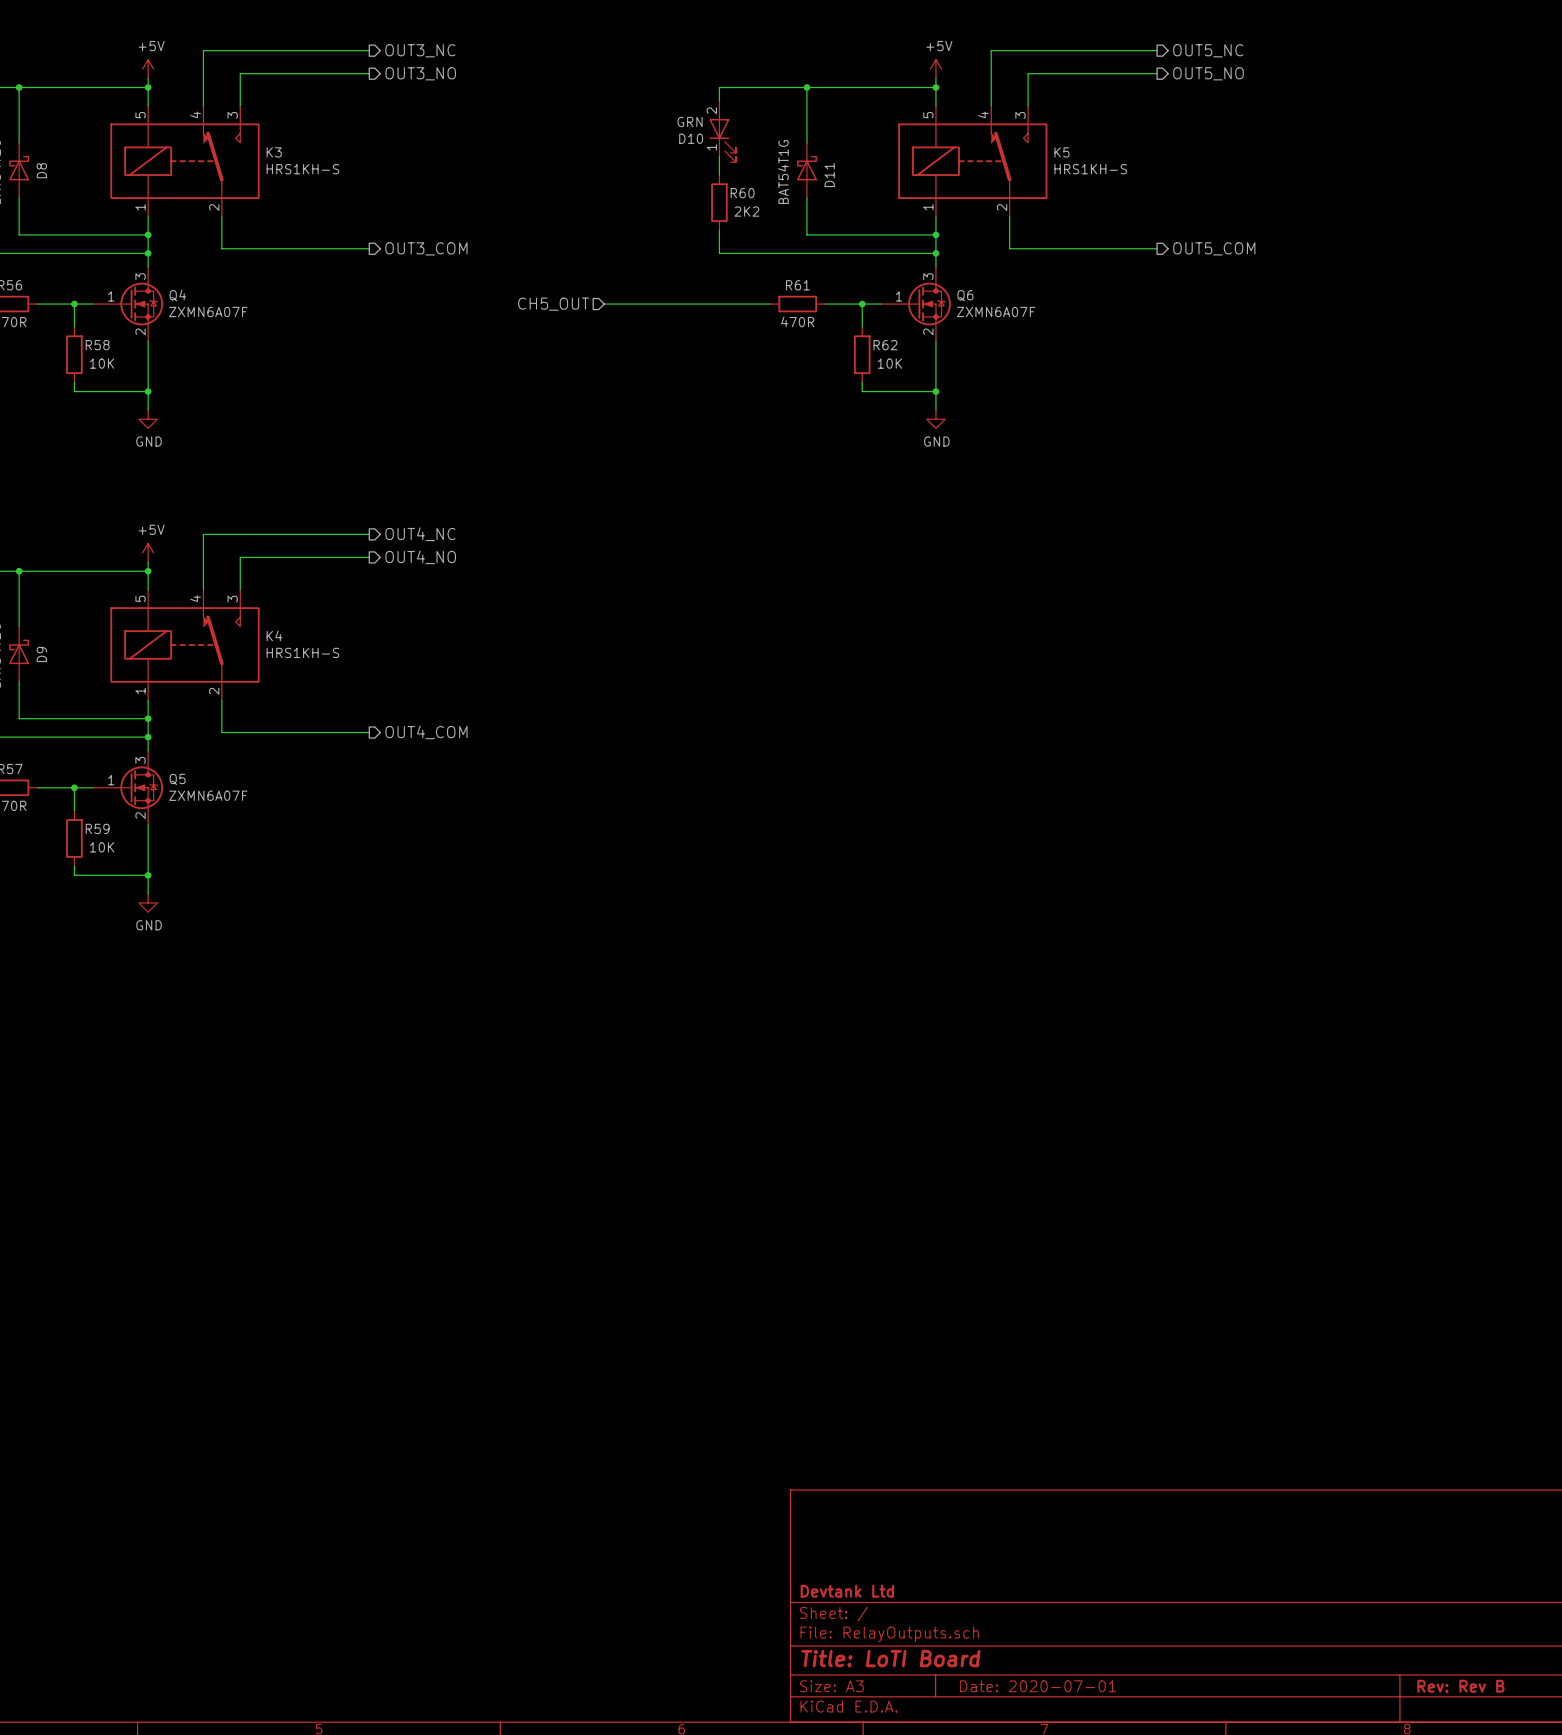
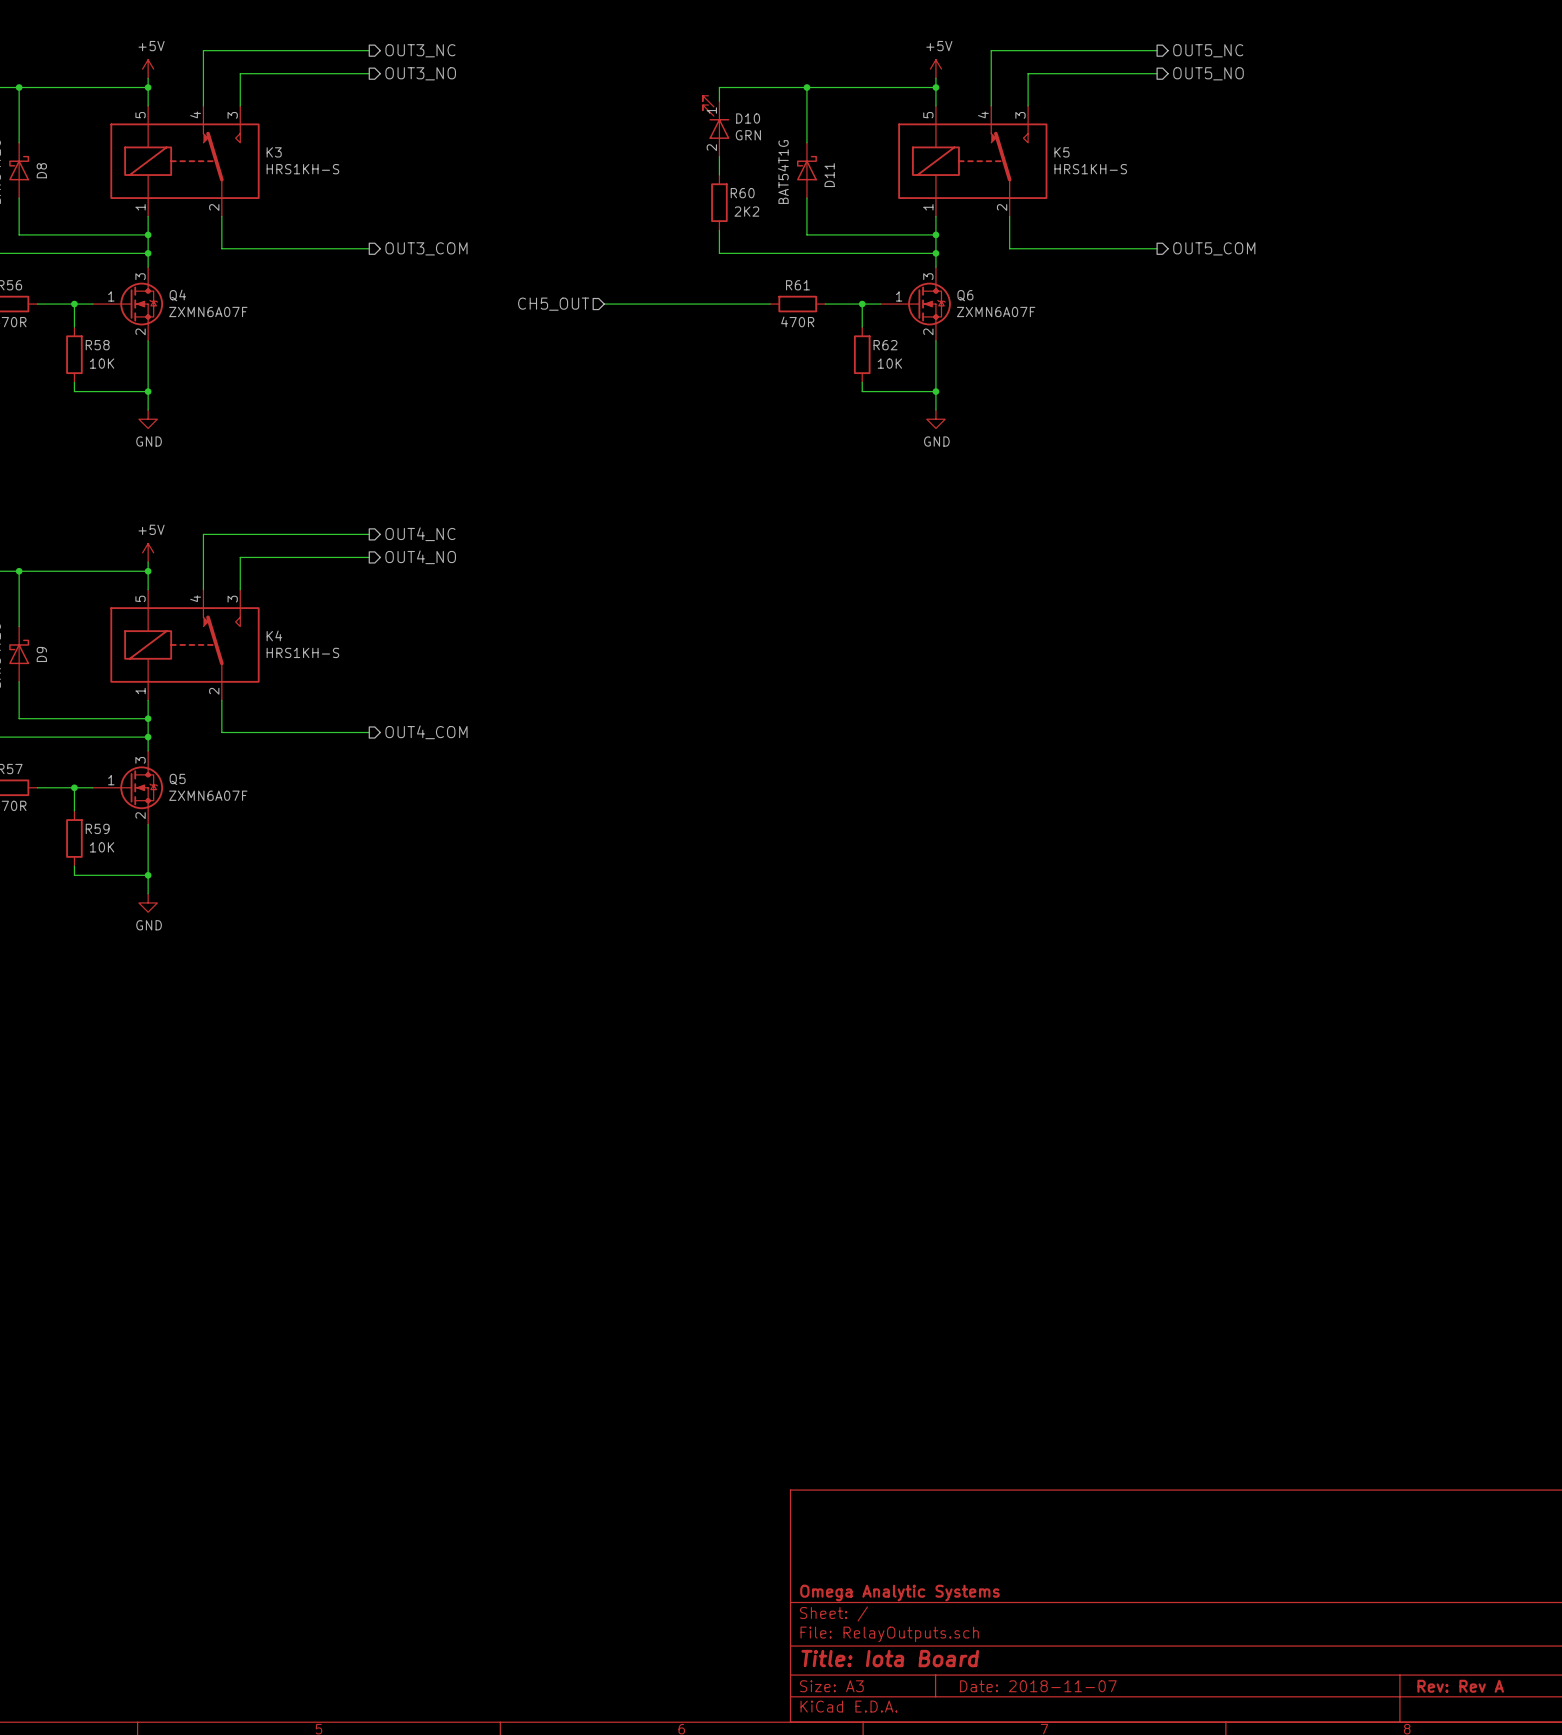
D10 rotation: 0° (722, 140) -> 180° (716, 117)
title block: Devtank Ltd (847, 1591) -> Omega Analytic Systems (899, 1593)
title block: Title: LoTI Board (890, 1658) -> Title: Iota Board (890, 1658)
title block: Date: 2020-07-01 (1038, 1686) -> Date: 2018-11-07 (1038, 1686)
title block: Rev: Rev B (1460, 1686) -> Rev: Rev A (1460, 1686)

